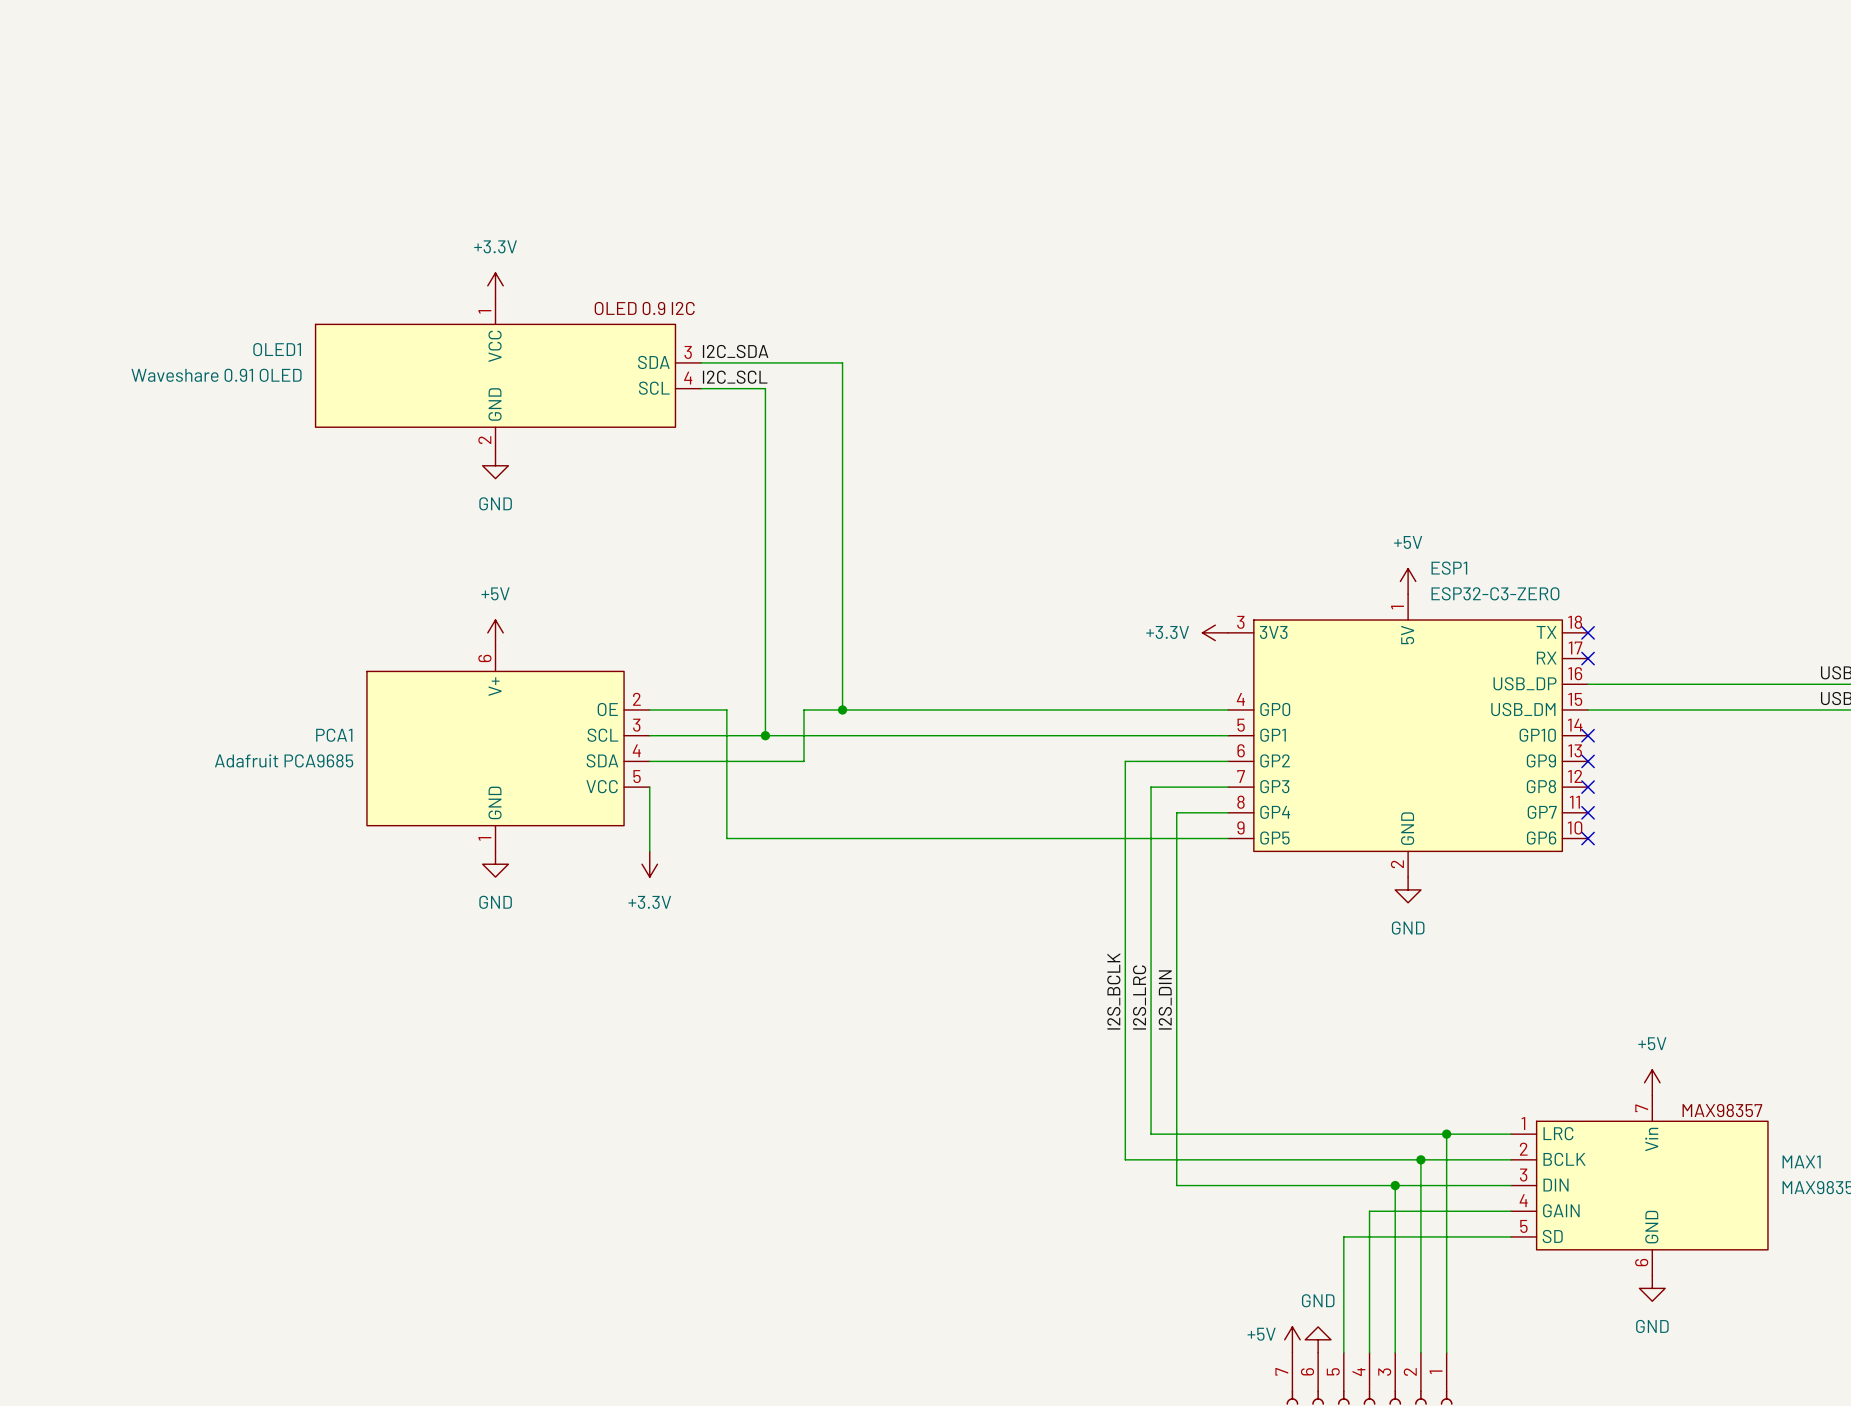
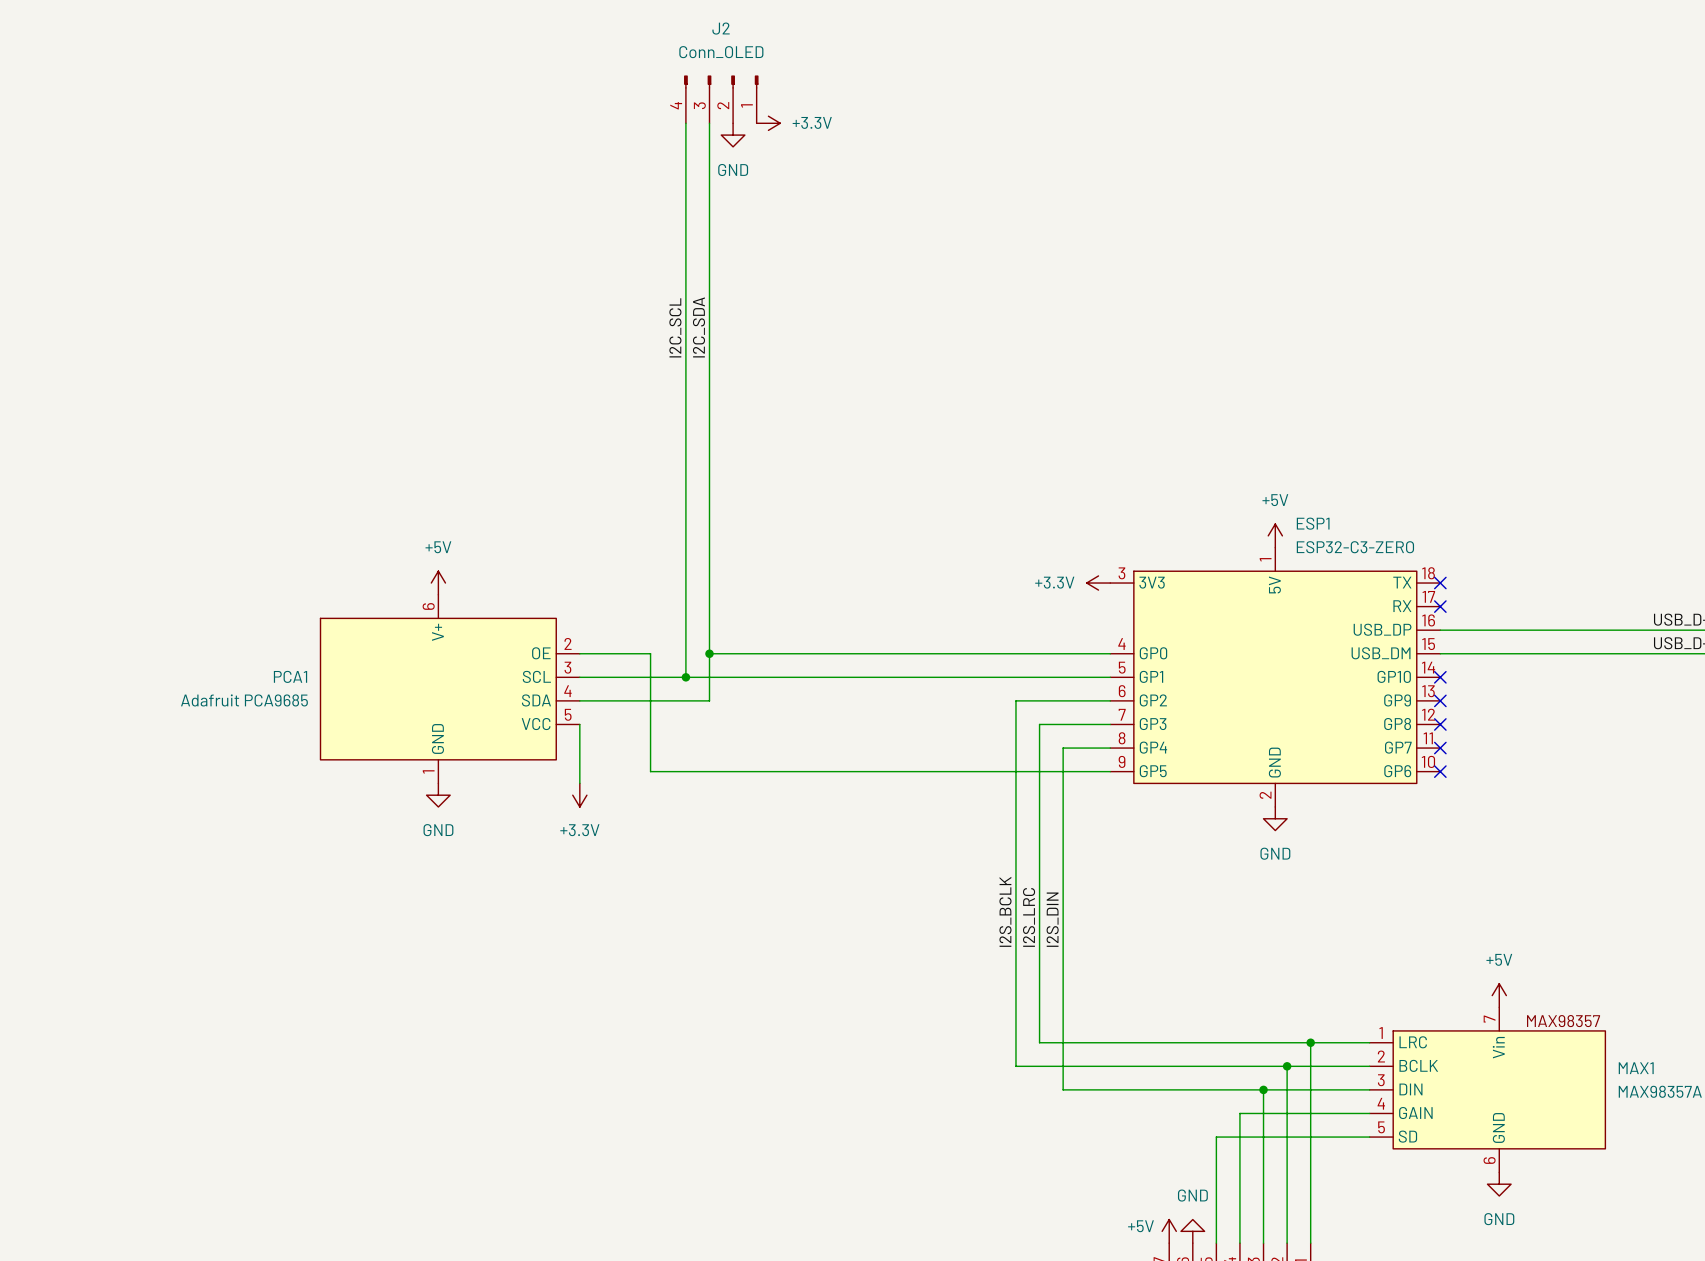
J2: none -> Conn_OLED (721, 99)
wire: none -> (709, 123) (709, 700)
power symbol: none -> +3.3V (768, 123)
power symbol: none -> GND (733, 135)
power symbol: +3.3V (495, 285) -> none
label rotation: 0° (735, 351) -> 90° counterclockwise (698, 327)
wire: (701, 362) (842, 362) (842, 709) -> none
OLED1: Waveshare 0.91 OLED (508, 375) -> none
label rotation: 0° (735, 377) -> 90° counterclockwise (675, 327)
wire: (701, 388) (765, 388) -> (685, 123) (685, 359)
power symbol: GND (495, 465) -> none
wire: (803, 709) (803, 761) (791, 761) -> (721, 653) (709, 653)
junction position: (842, 709) -> (709, 653)

